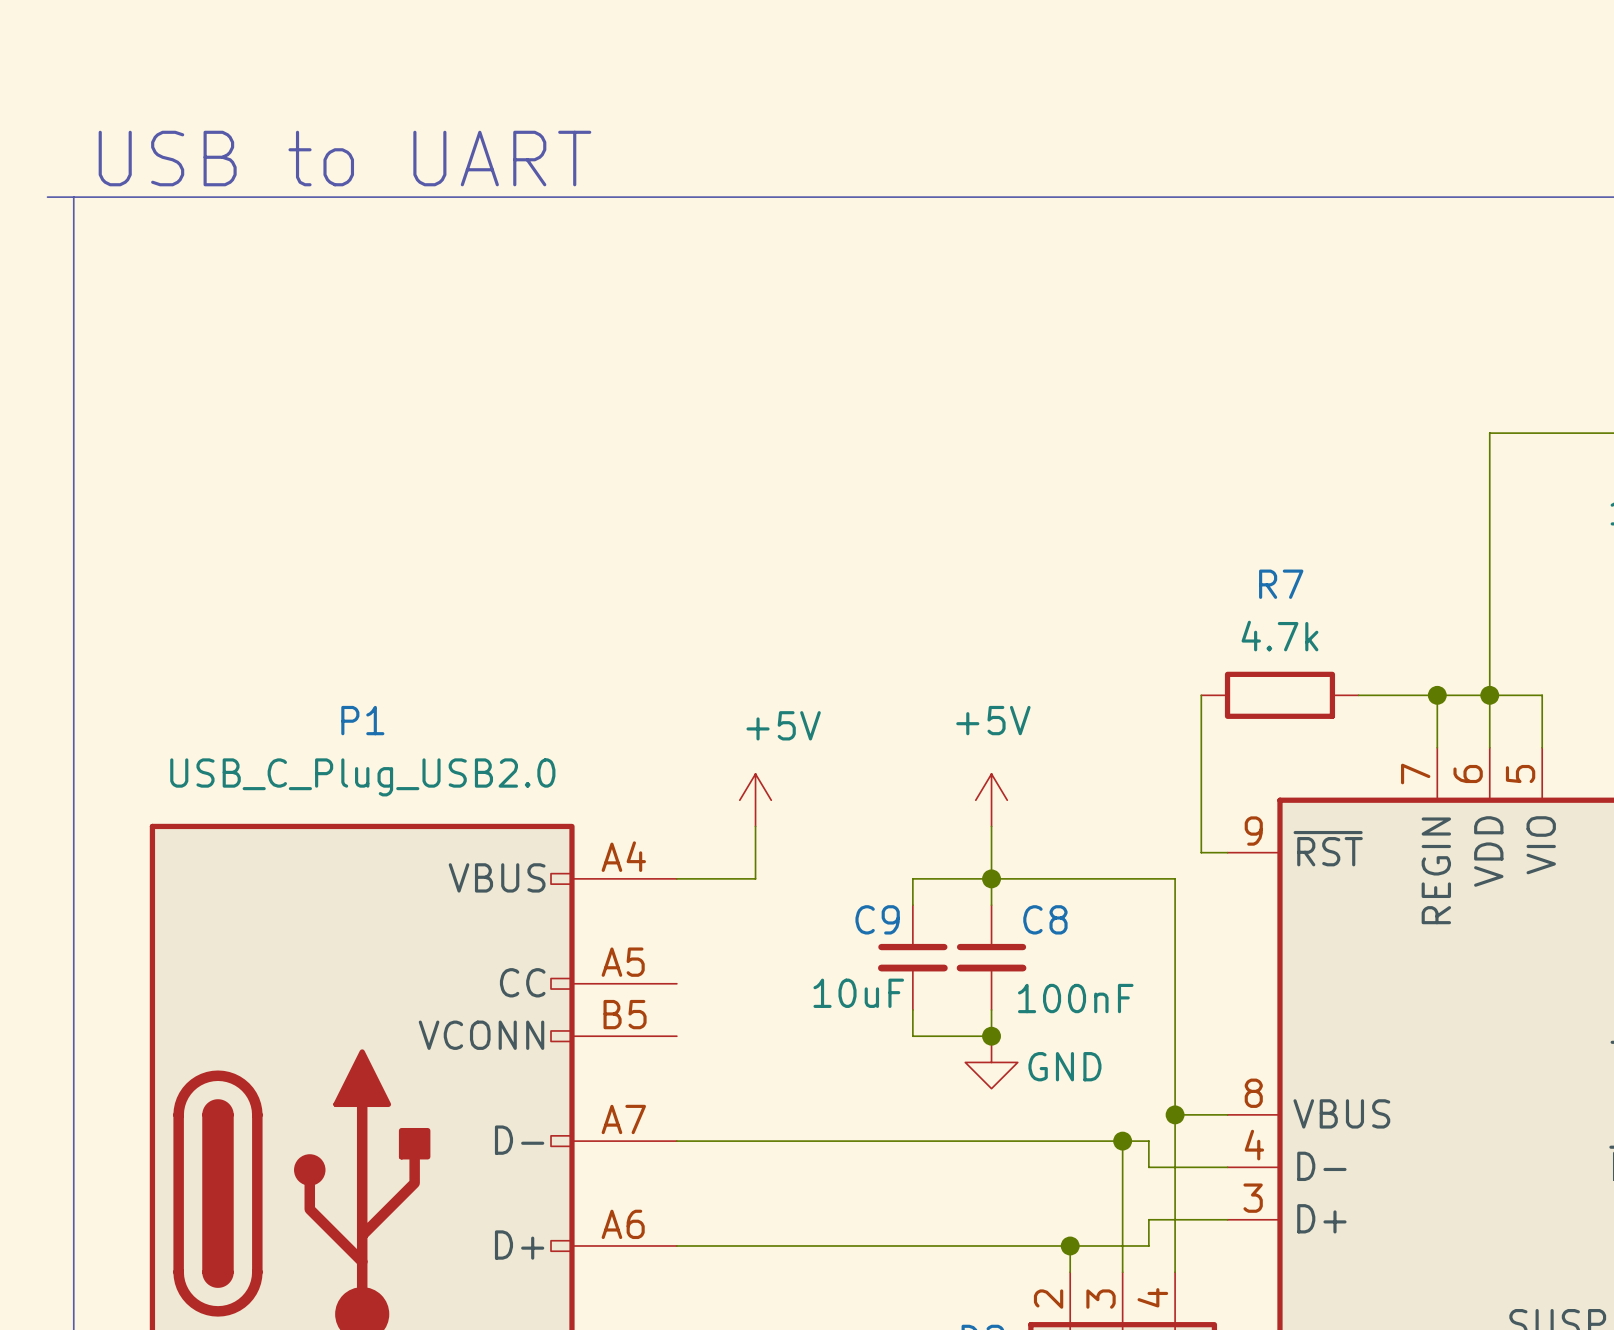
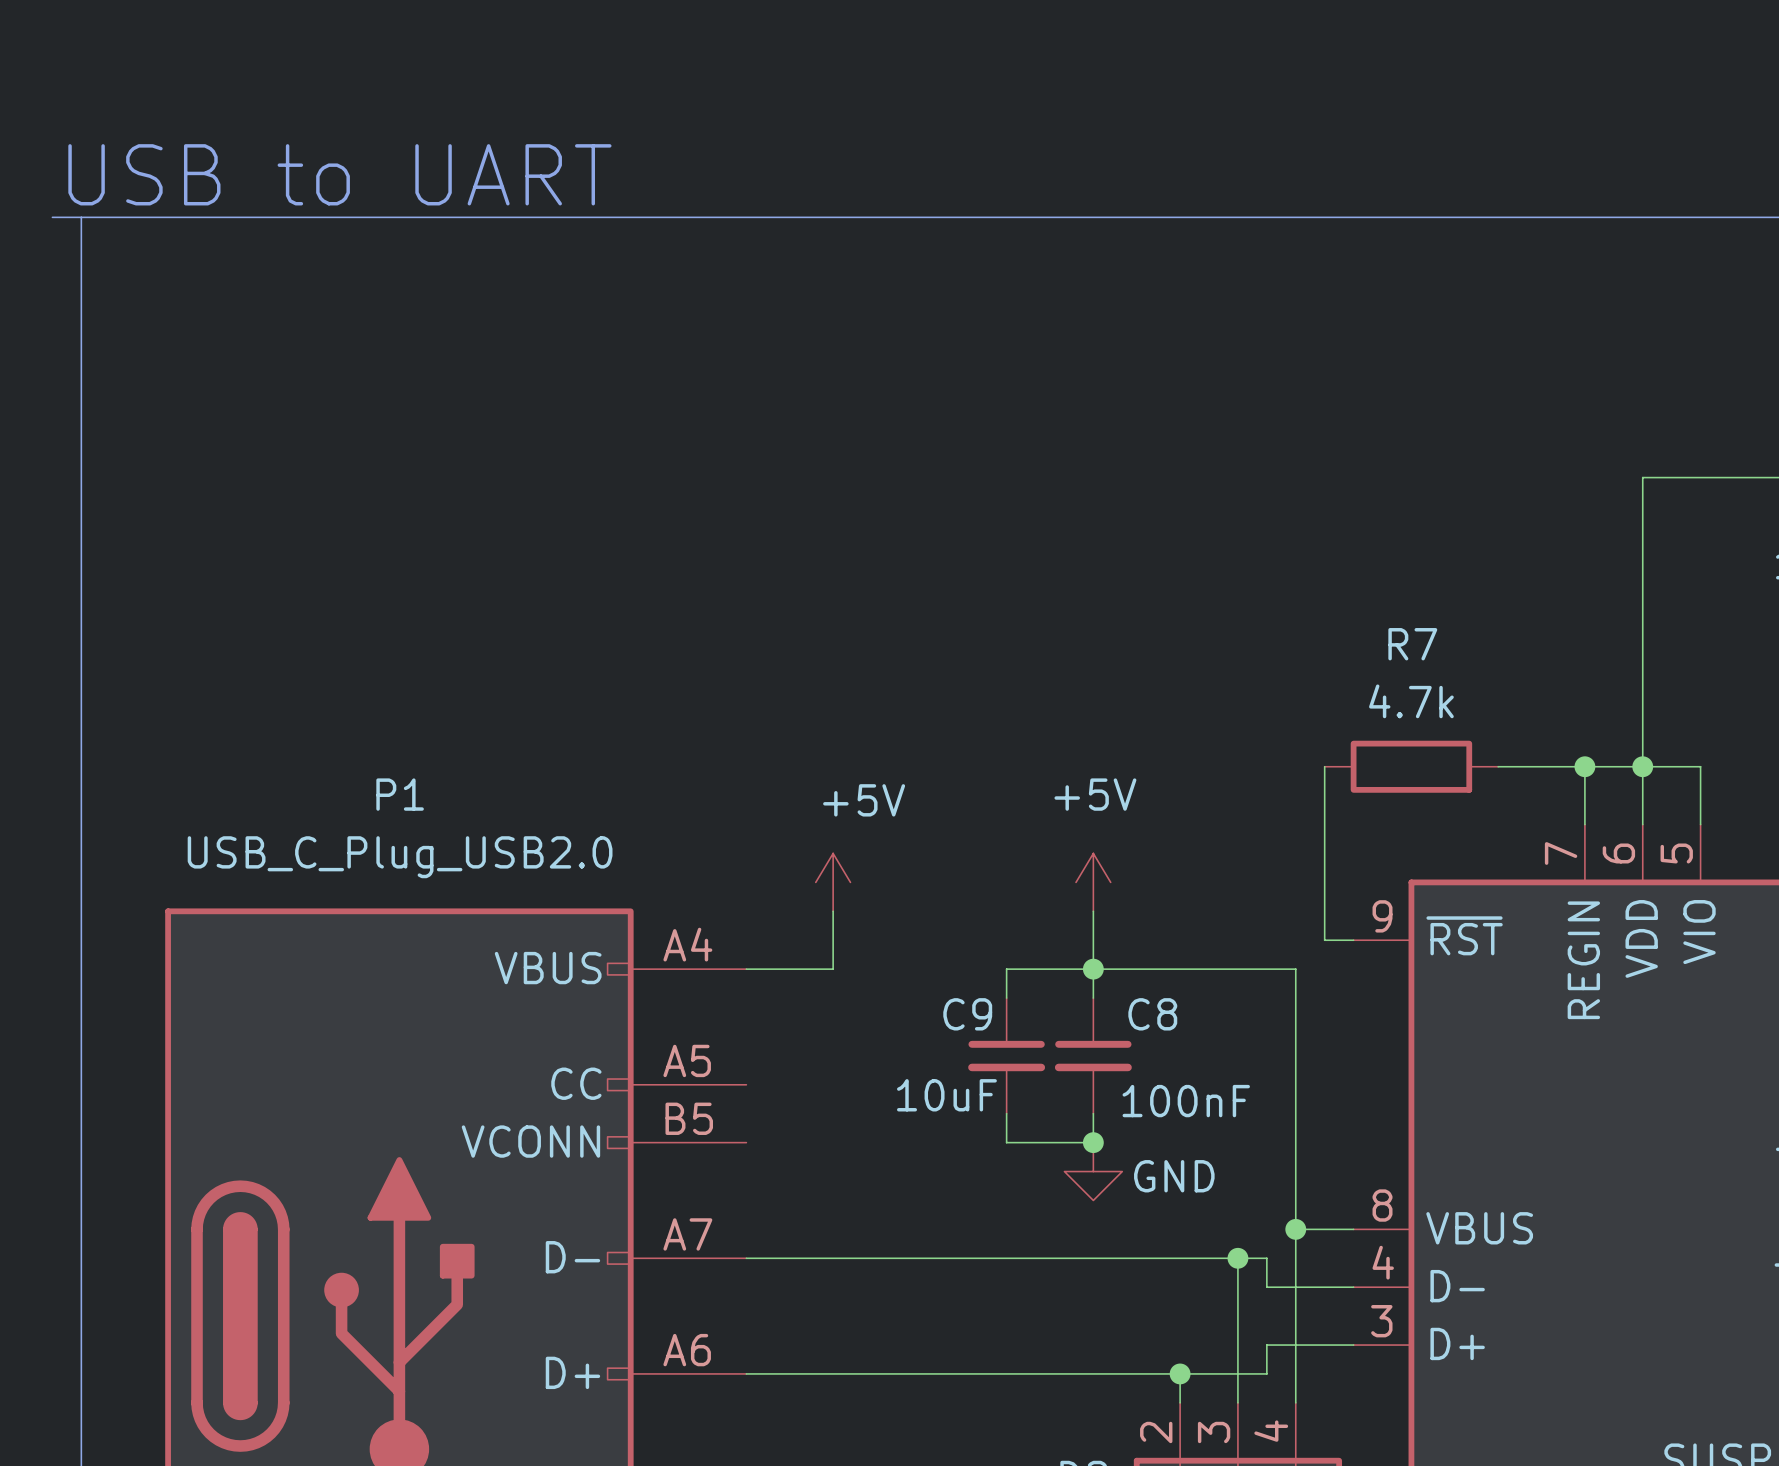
text position: USB to UART (344, 158) -> USB to UART (339, 174)

